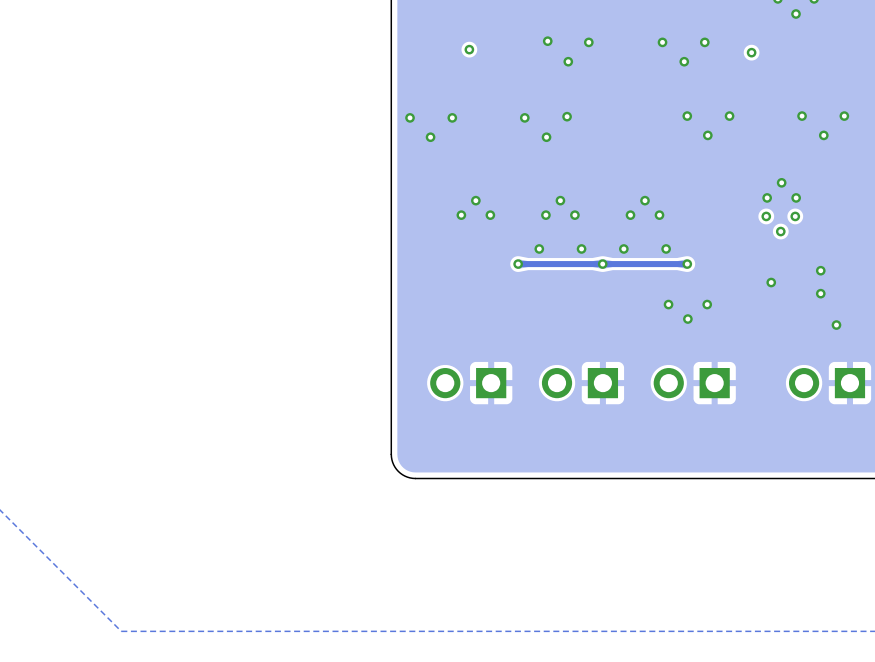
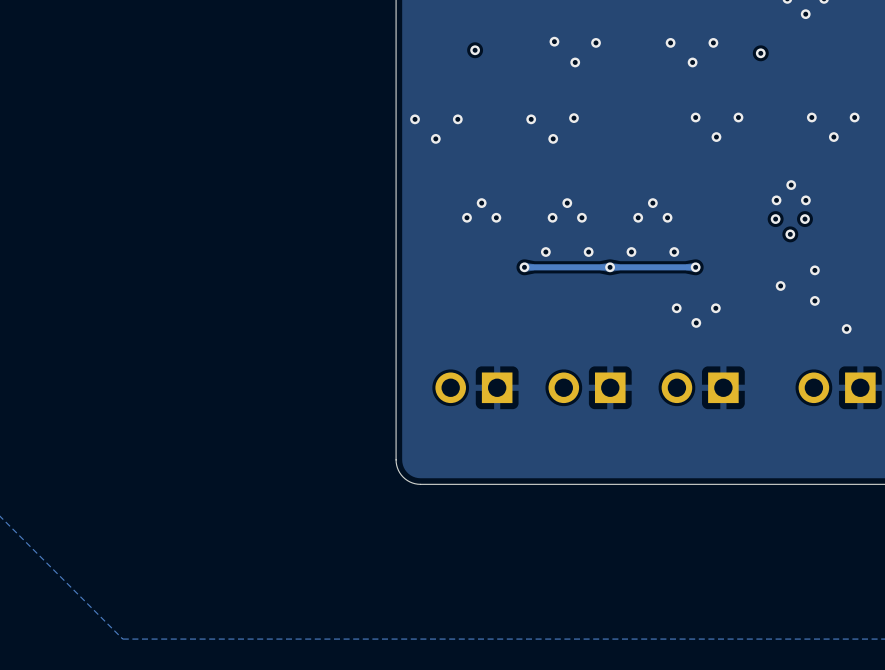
via: none -> (814, 270)
via: (820, 270) -> none
via: (820, 293) -> none
via: none -> (814, 300)

